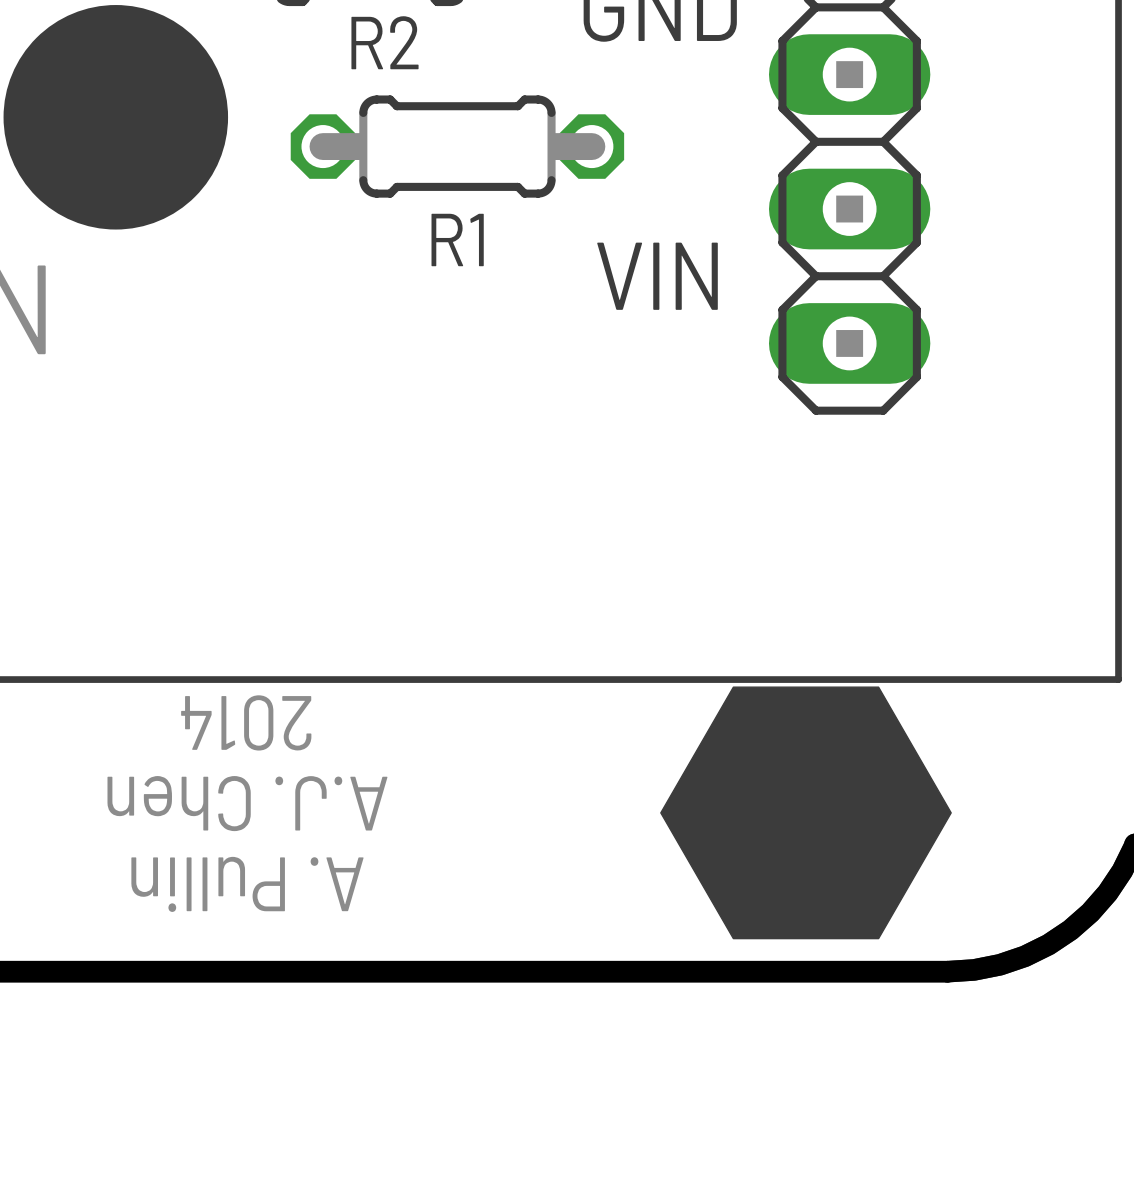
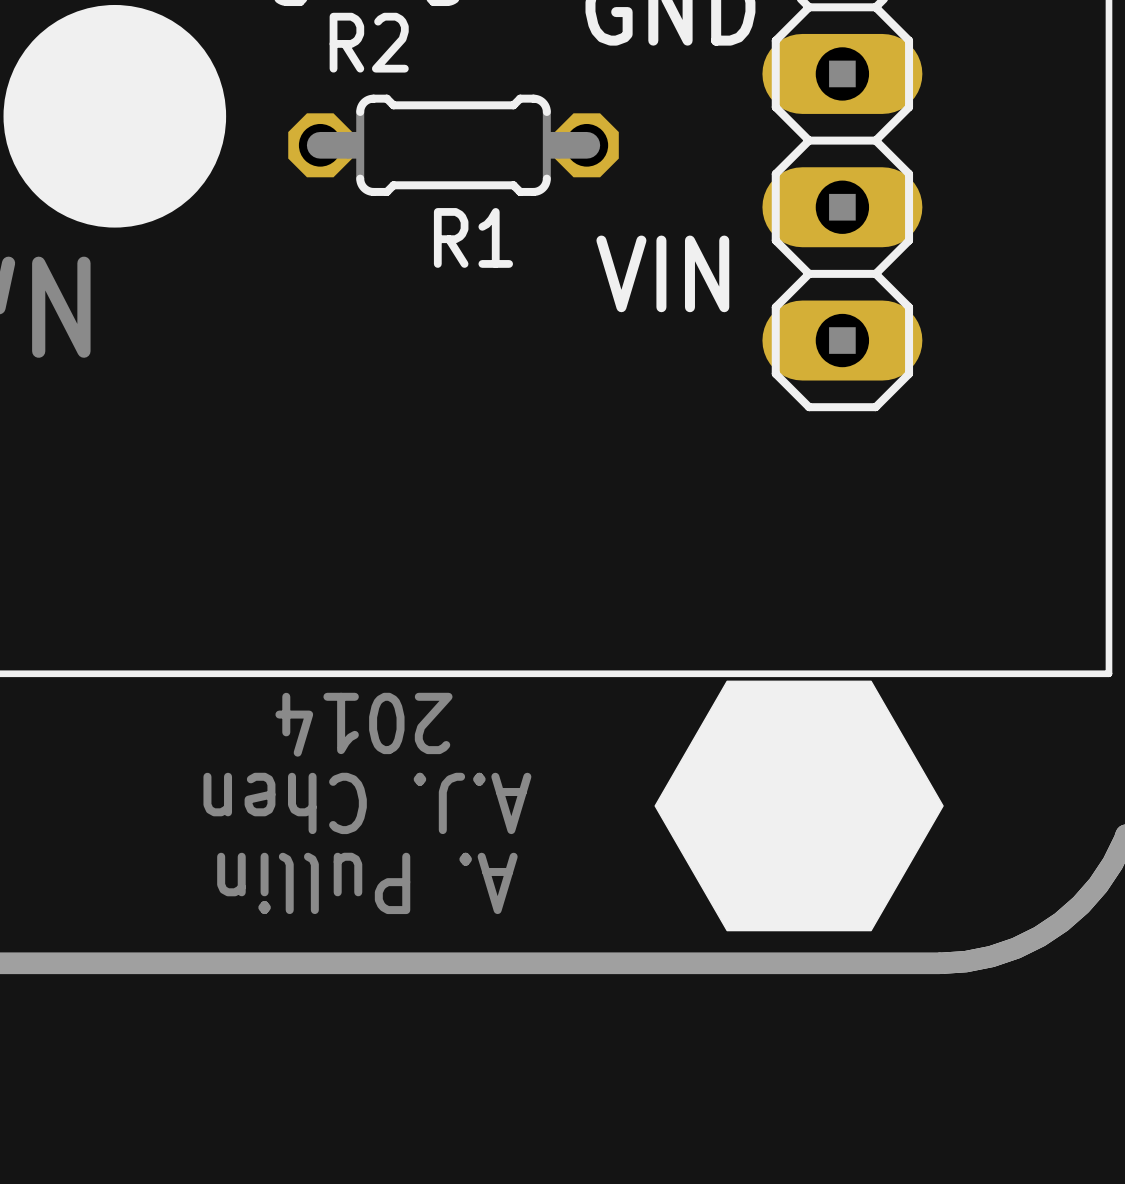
text position: 2014 (246, 722) -> 2014 (363, 724)
text position: A.J. Chen (247, 803) -> A.J. Chen (367, 803)
text position: A. Pullin (247, 884) -> A. Pullin (367, 883)

